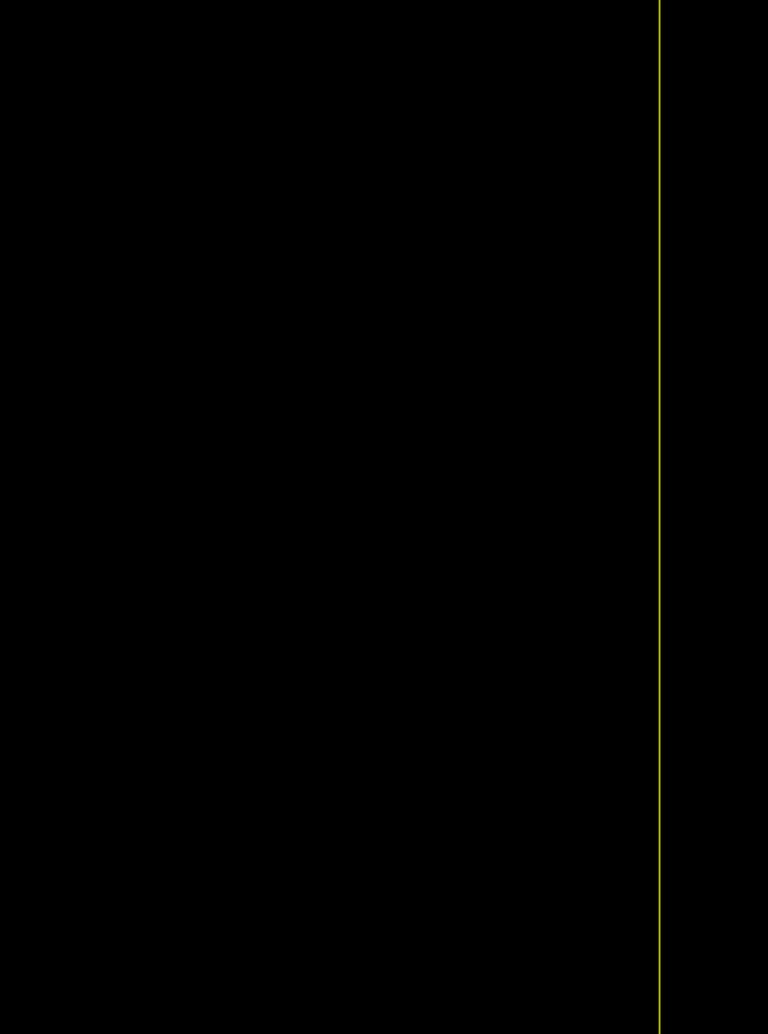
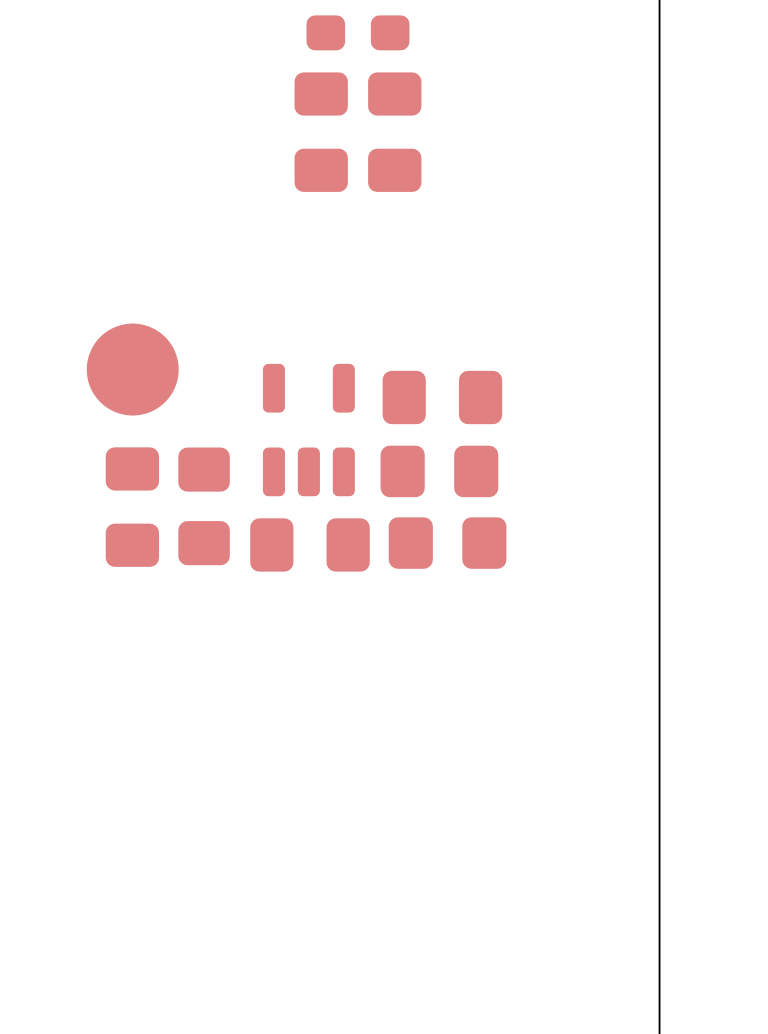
part: none -> (357, 32)
part: none -> (321, 132)
part: none -> (394, 132)
part: none -> (132, 369)
part: none -> (442, 397)
part: none -> (308, 430)
part: none -> (439, 471)
part: none -> (204, 506)
part: none -> (132, 507)
part: none -> (447, 543)
part: none -> (309, 544)

